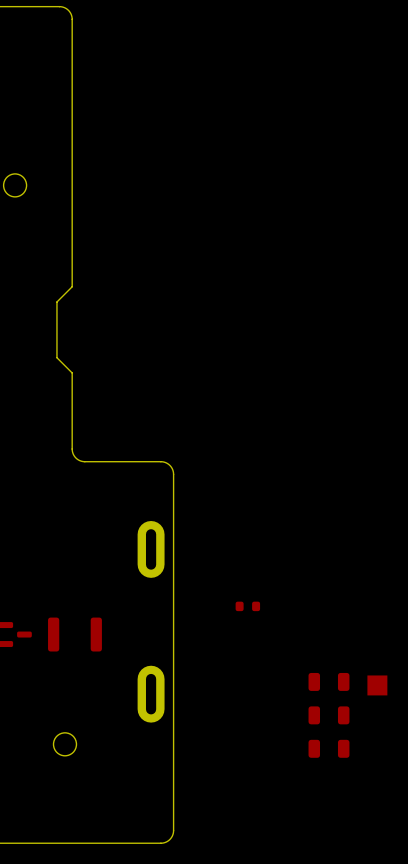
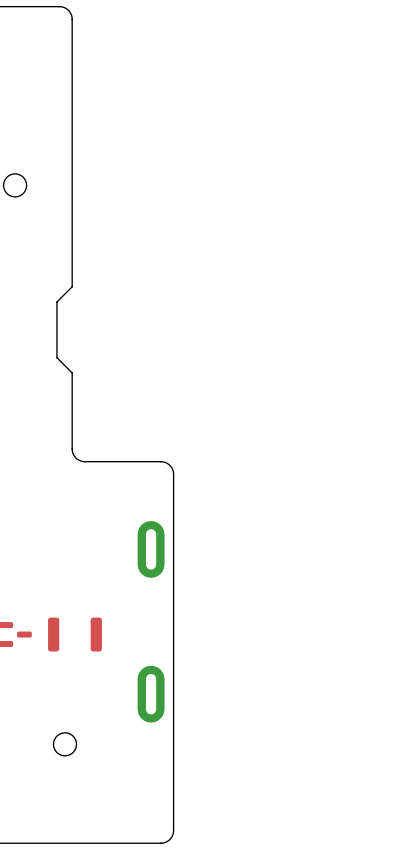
part: (247, 606) -> none
part: (328, 681) -> none
part: (377, 685) -> none
part: (328, 715) -> none
part: (328, 748) -> none

